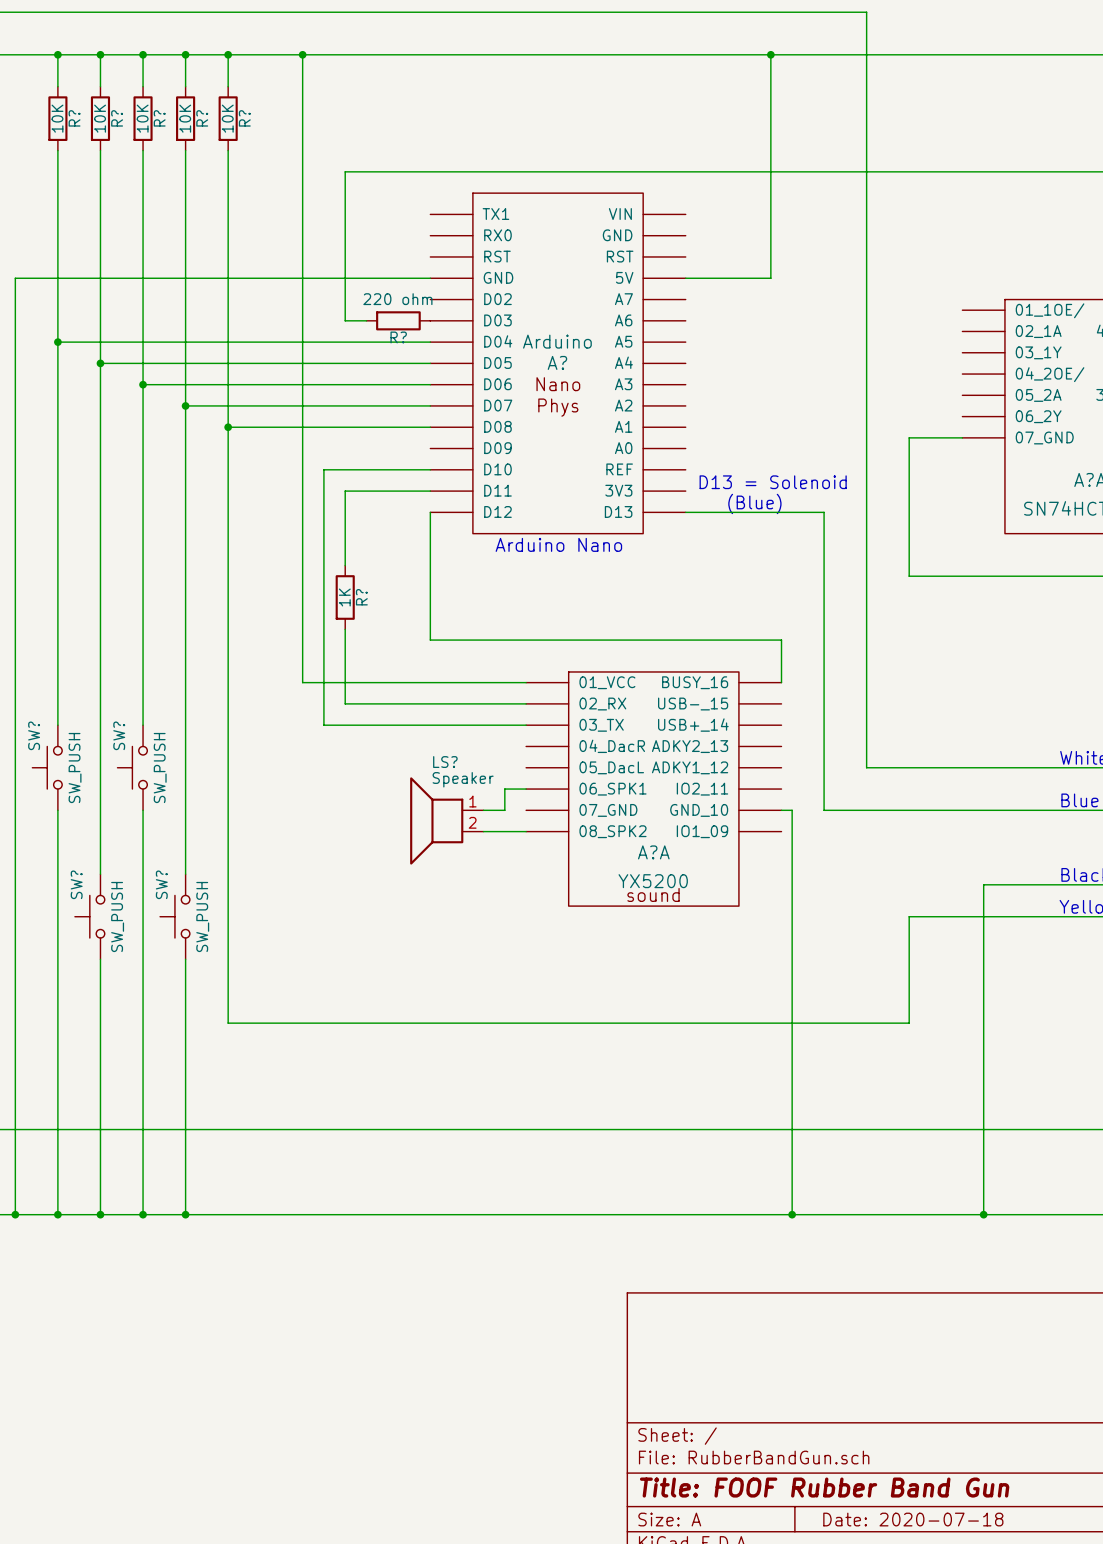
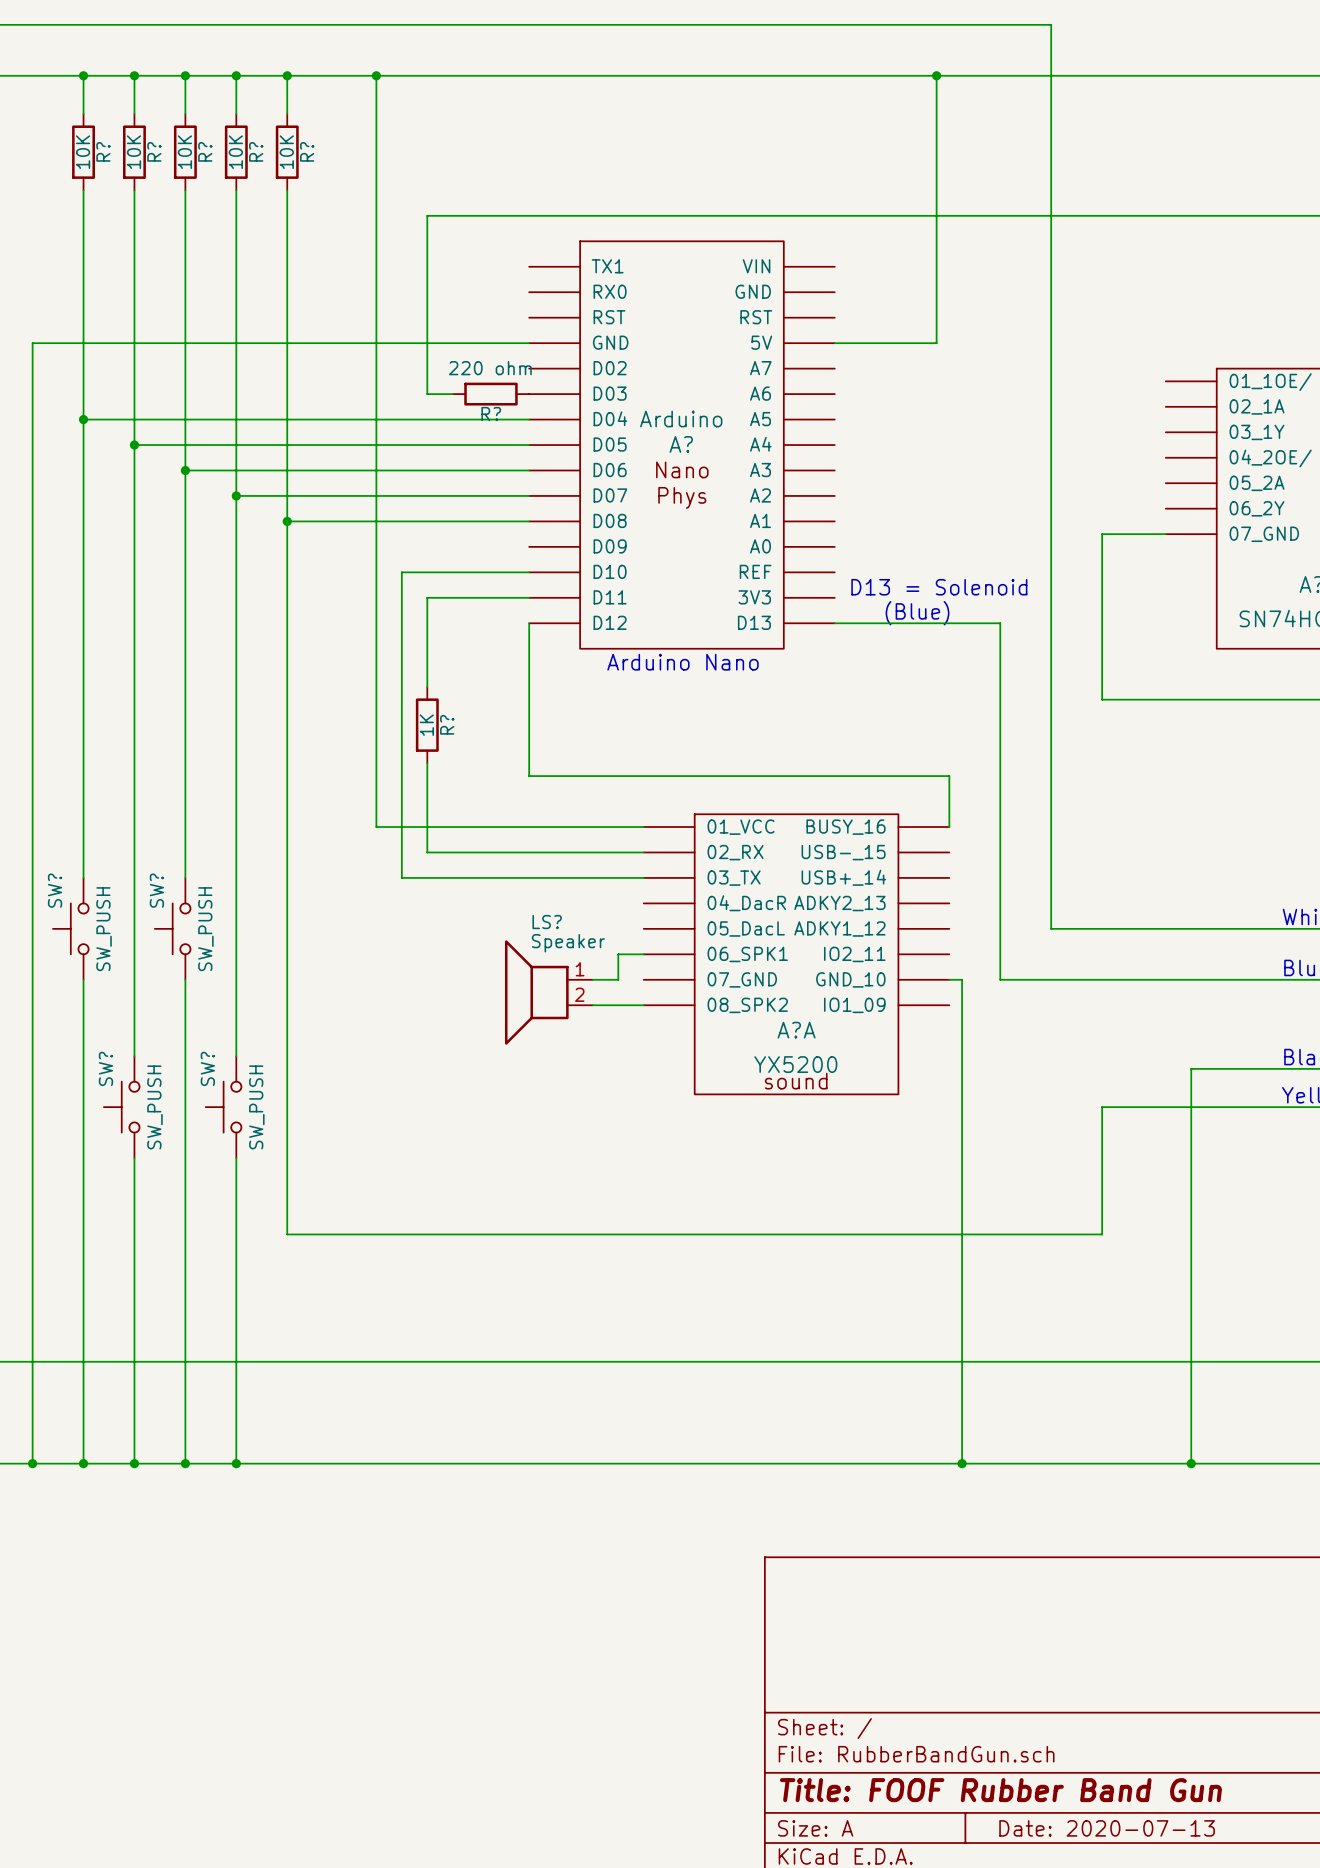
title block: Date: 2020-07-18 (913, 1519) -> Date: 2020-07-13 (1107, 1828)

